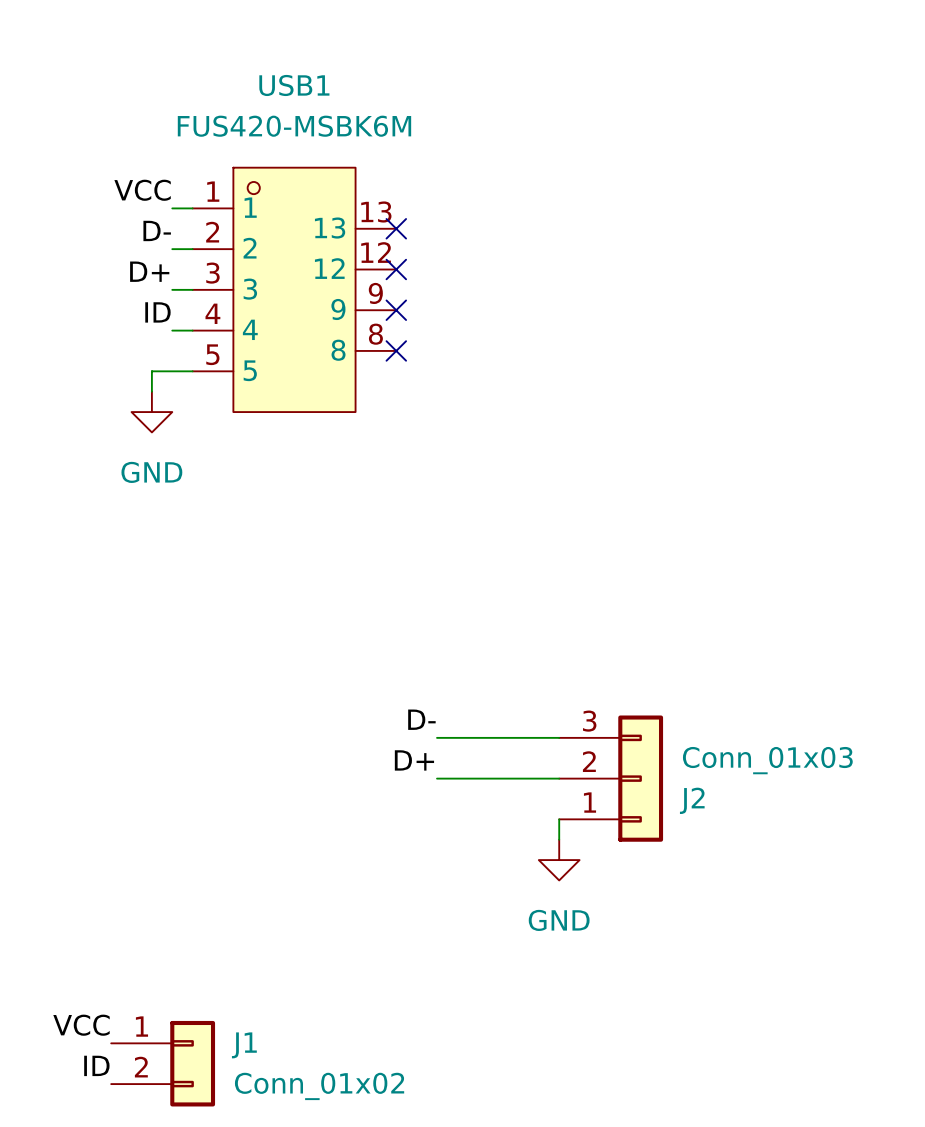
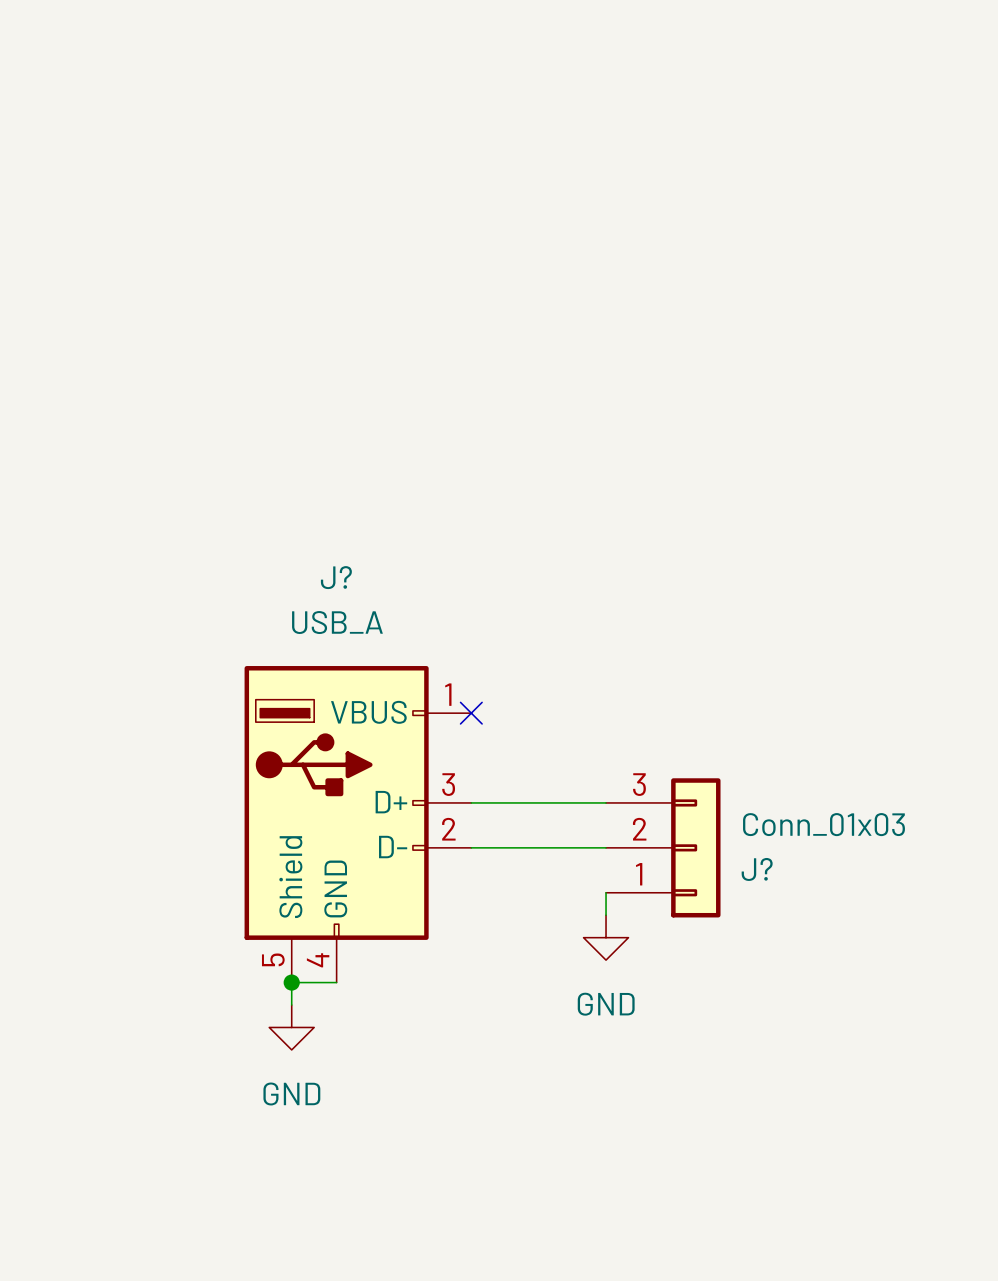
label: VCC (142, 190) -> none
wire: (172, 208) (192, 208) -> none
no-connect mark: (396, 228) -> none
label: D- (157, 230) -> none
wire: (172, 249) (192, 249) -> none
no-connect mark: (396, 269) -> none
label: D+ (149, 271) -> none
wire: (172, 289) (192, 289) -> none
USB1: FUS420-MSBK6M (294, 289) -> none
no-connect mark: (396, 310) -> none
label: ID (157, 312) -> none
wire: (172, 330) (192, 330) -> none
no-connect mark: (396, 350) -> none
wire: (192, 371) (151, 371) (151, 391) -> none
power symbol: GND (151, 412) -> none
no-connect mark: none -> (471, 713)
label: D- (421, 719) -> none
J?: none -> USB_A (357, 824)
label: D+ (414, 760) -> none
J2 name: J2 (692, 800) -> J? (757, 869)
junction: none -> (291, 982)
wire: none -> (336, 982) (291, 982) (291, 1005)
power symbol: none -> GND (291, 1027)
label: VCC (81, 1025) -> none
J1: Conn_01x02 (163, 1063) -> none
label: ID (96, 1065) -> none

